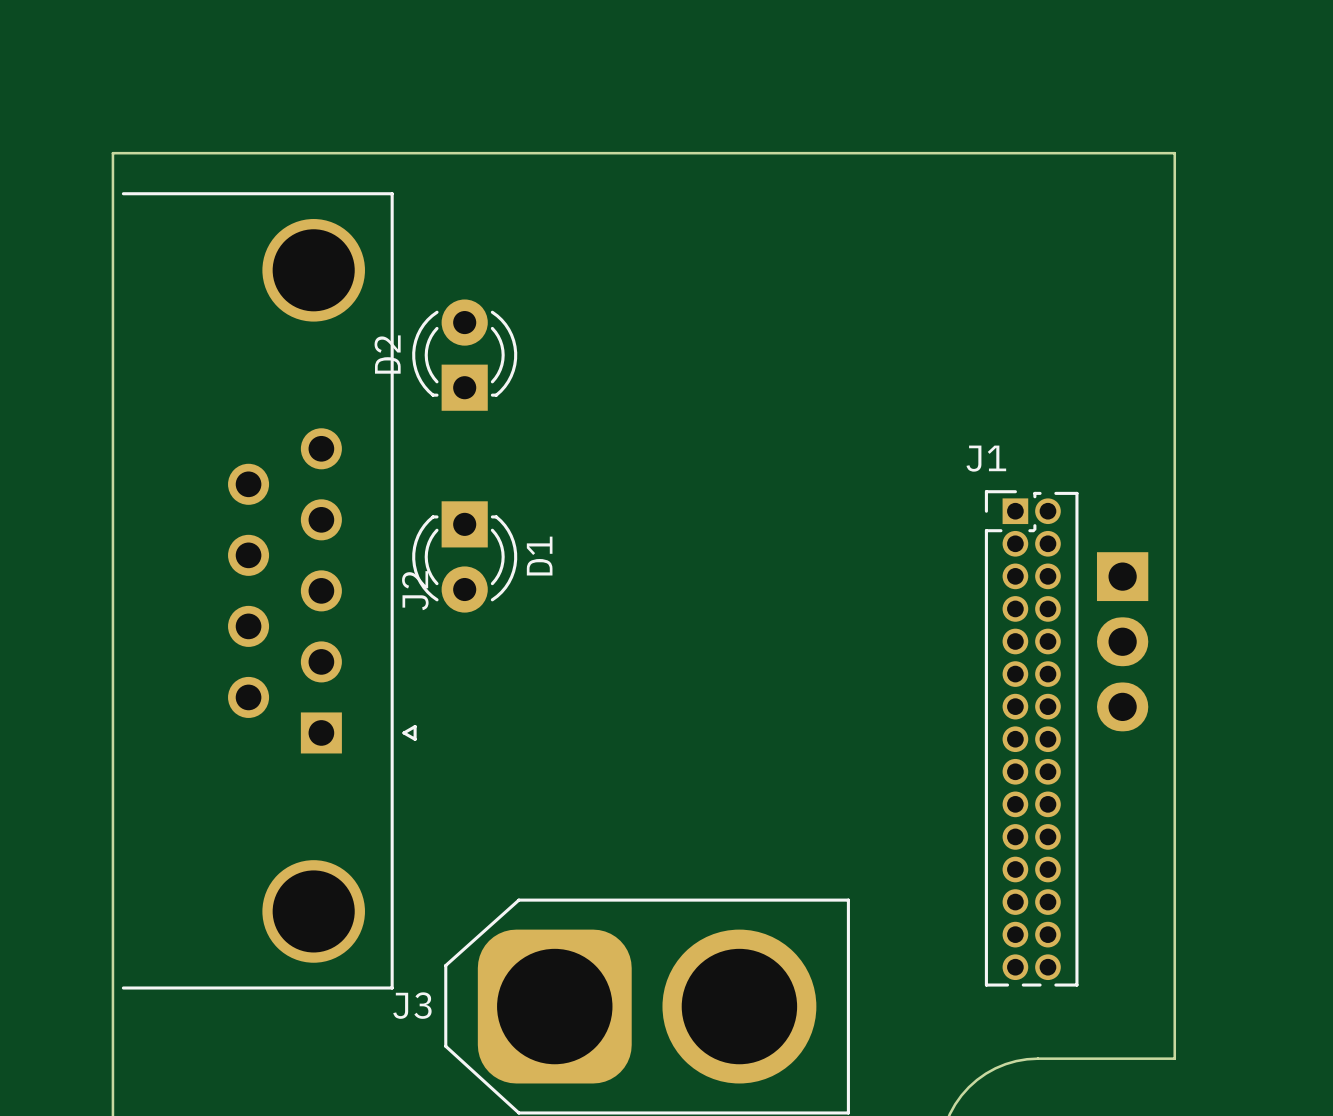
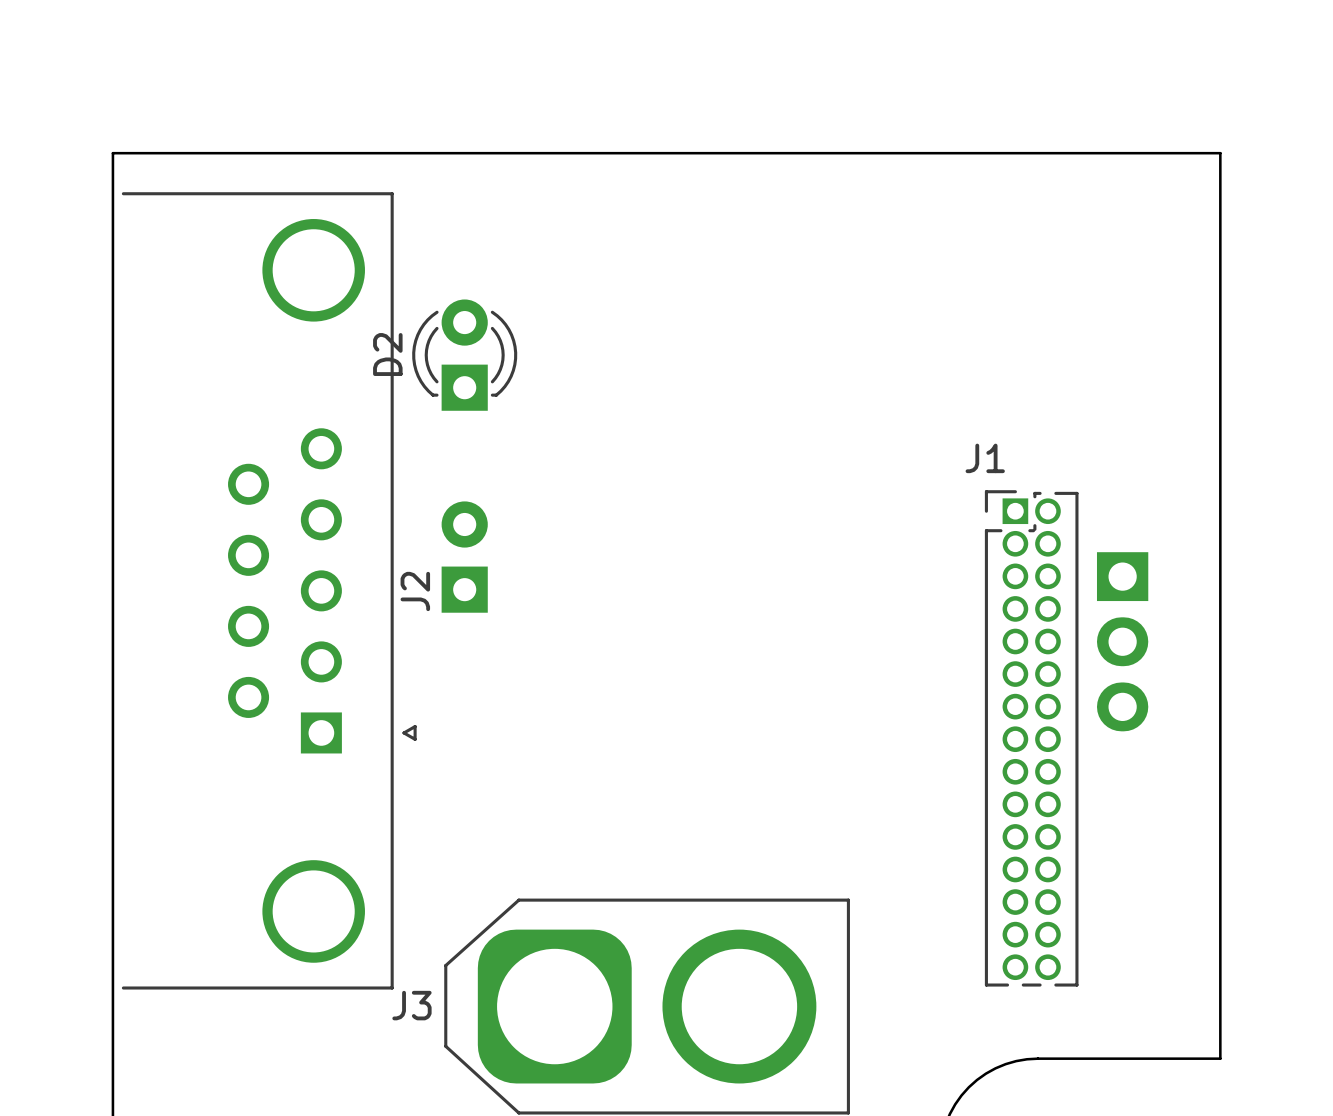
board edge: (1174, 153) (1174, 1058) -> (1174, 153) (1220, 153) (1220, 1058) (1174, 1058)
D1 side: top (464, 556) -> bottom (464, 557)

